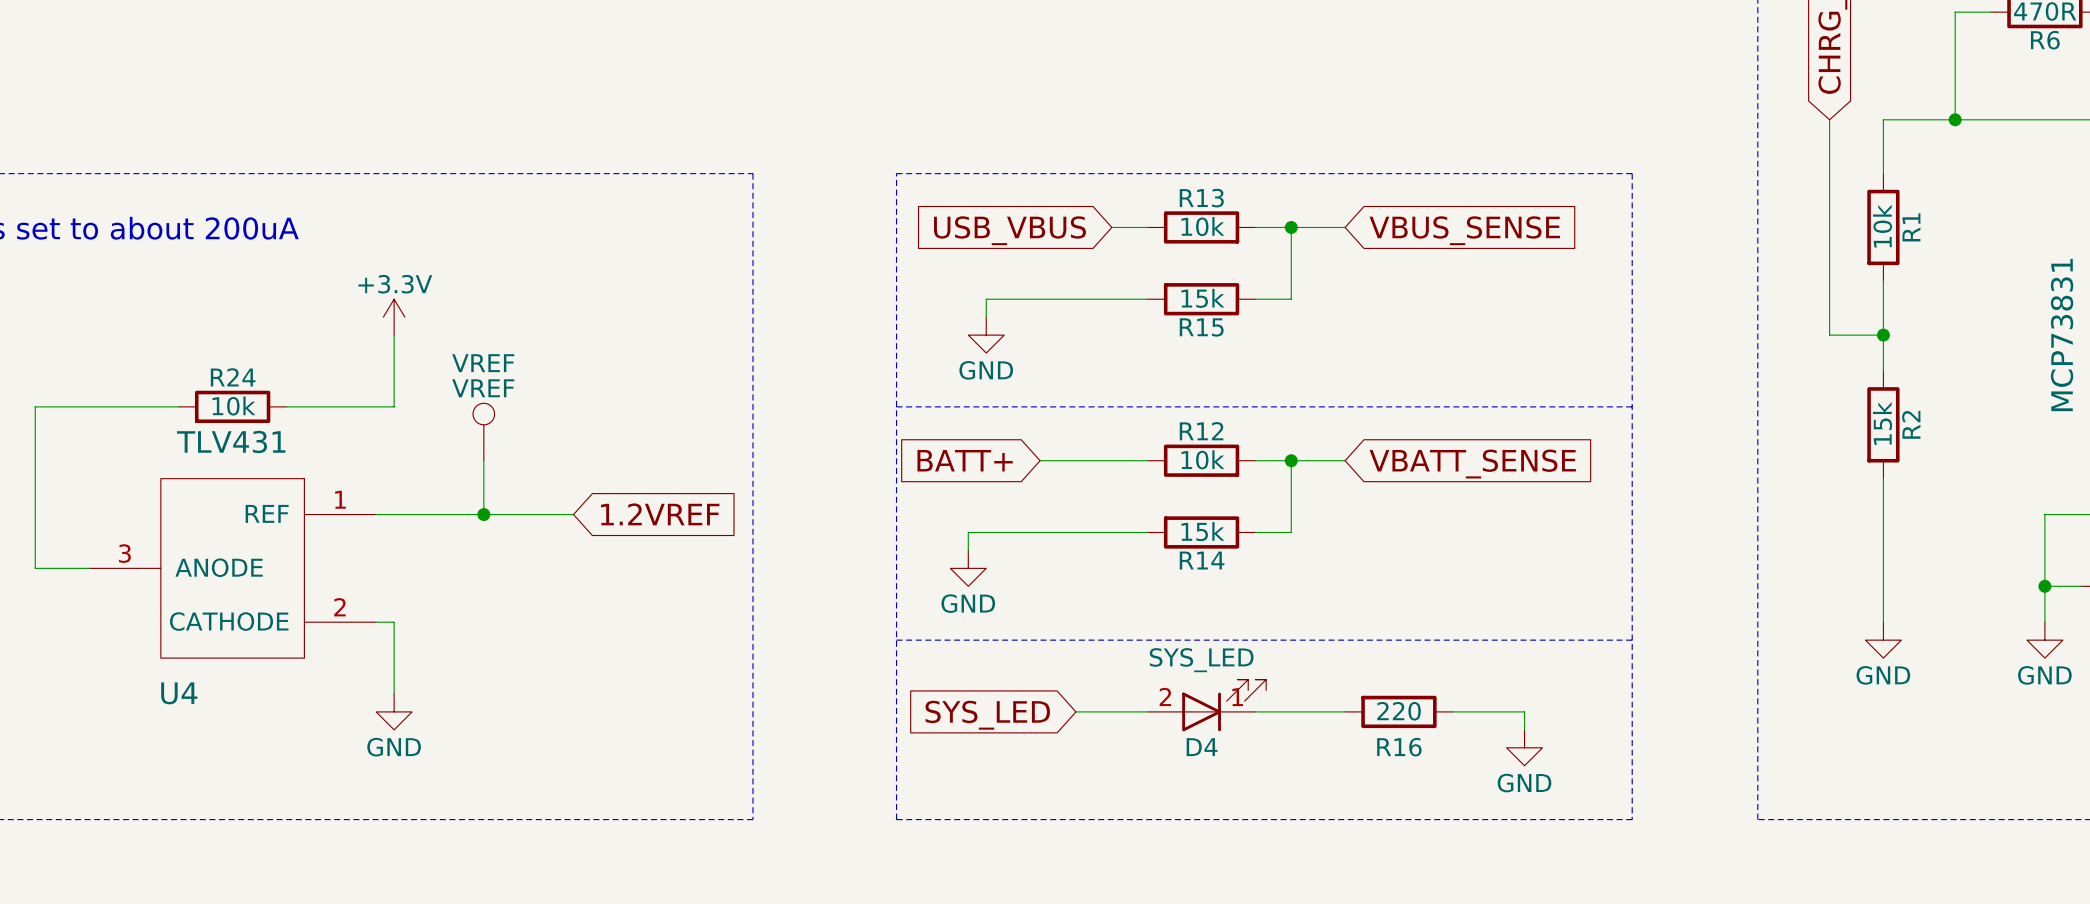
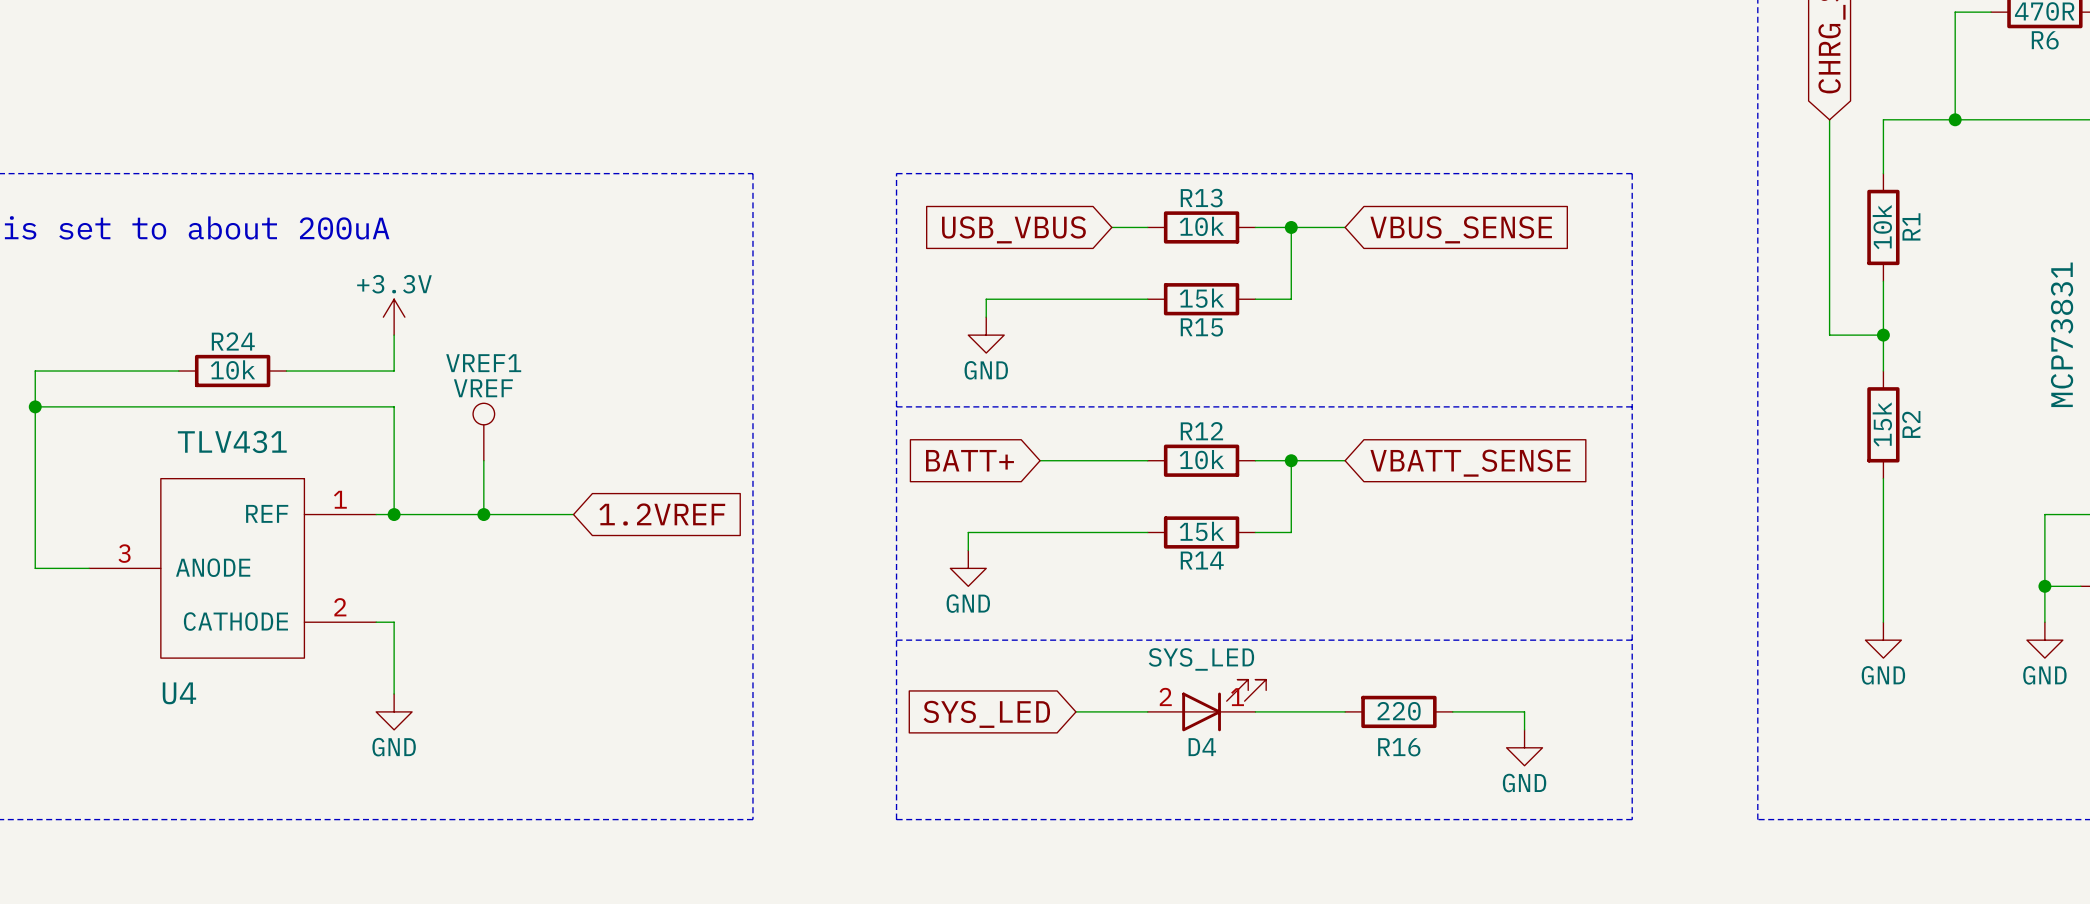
VREF name: VREF (483, 363) -> VREF1 (483, 363)
wire: none -> (178, 371) (35, 371) (35, 406)
wire: (394, 371) (394, 406) -> (394, 371) (286, 371)
junction: none -> (35, 406)
wire: none -> (178, 406) (286, 406)
R24 position: (232, 406) -> (232, 371)
wire: none -> (394, 406) (394, 514)
junction: none -> (394, 514)

